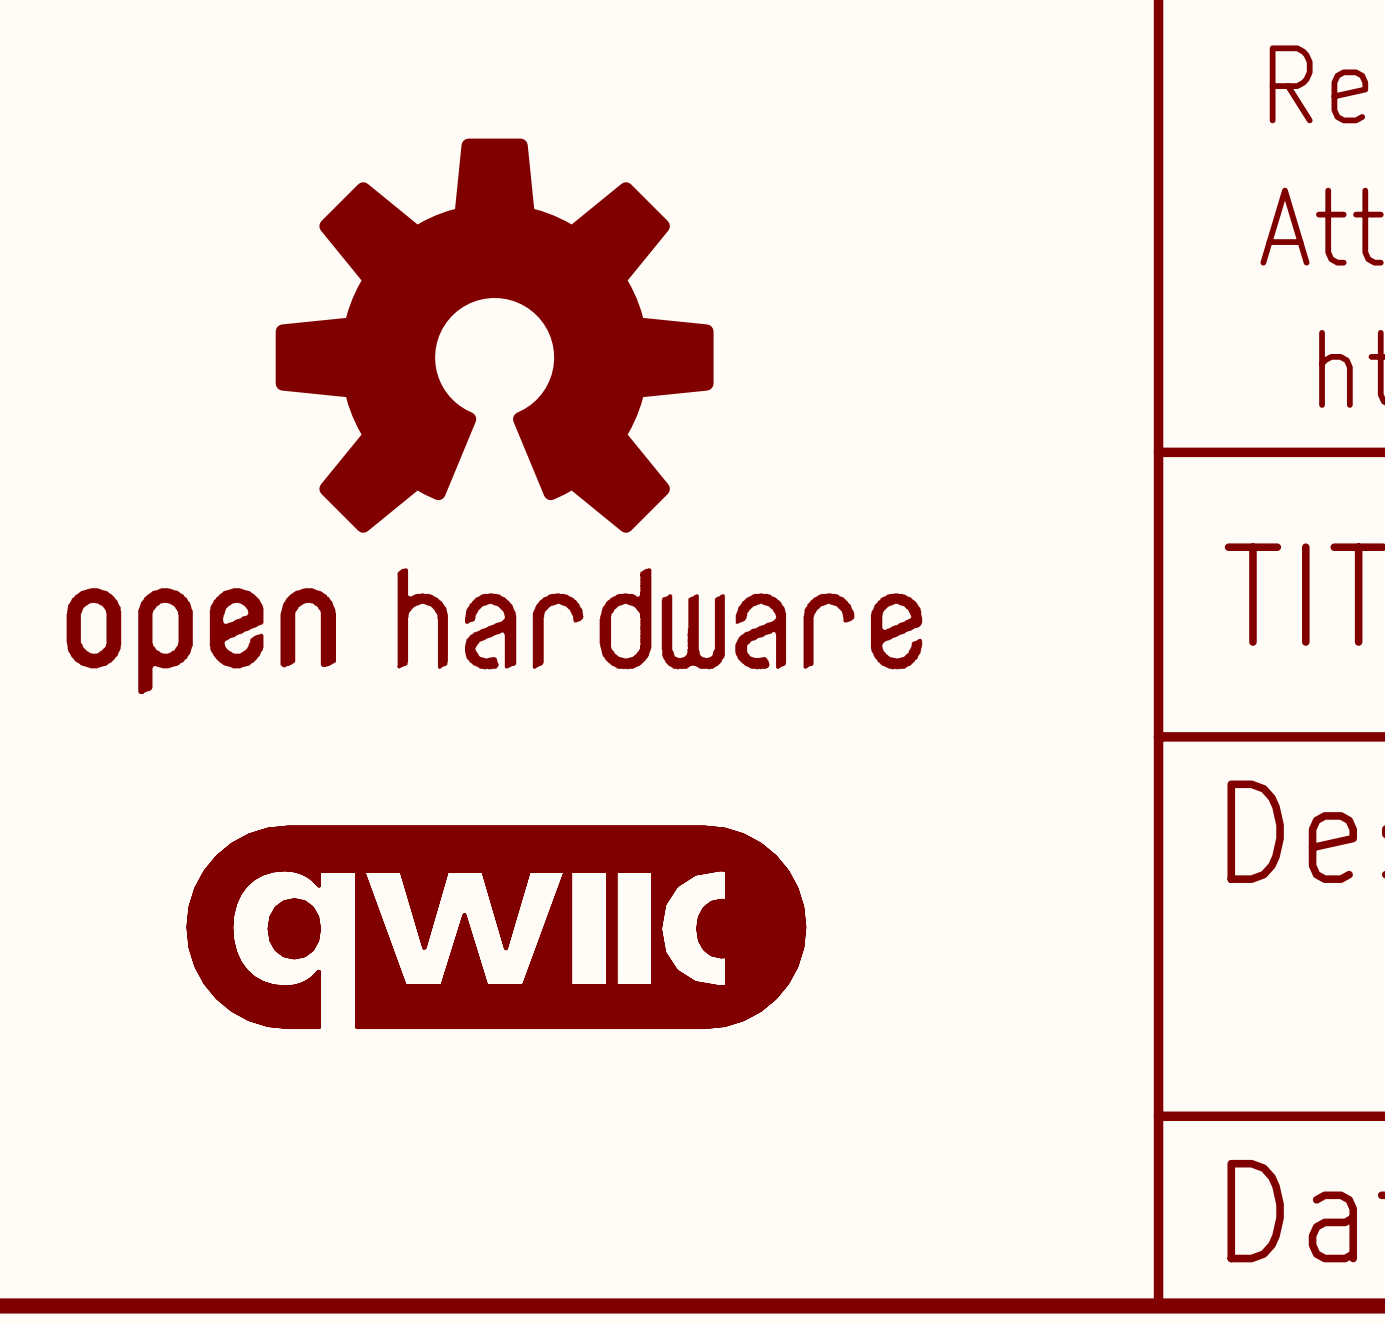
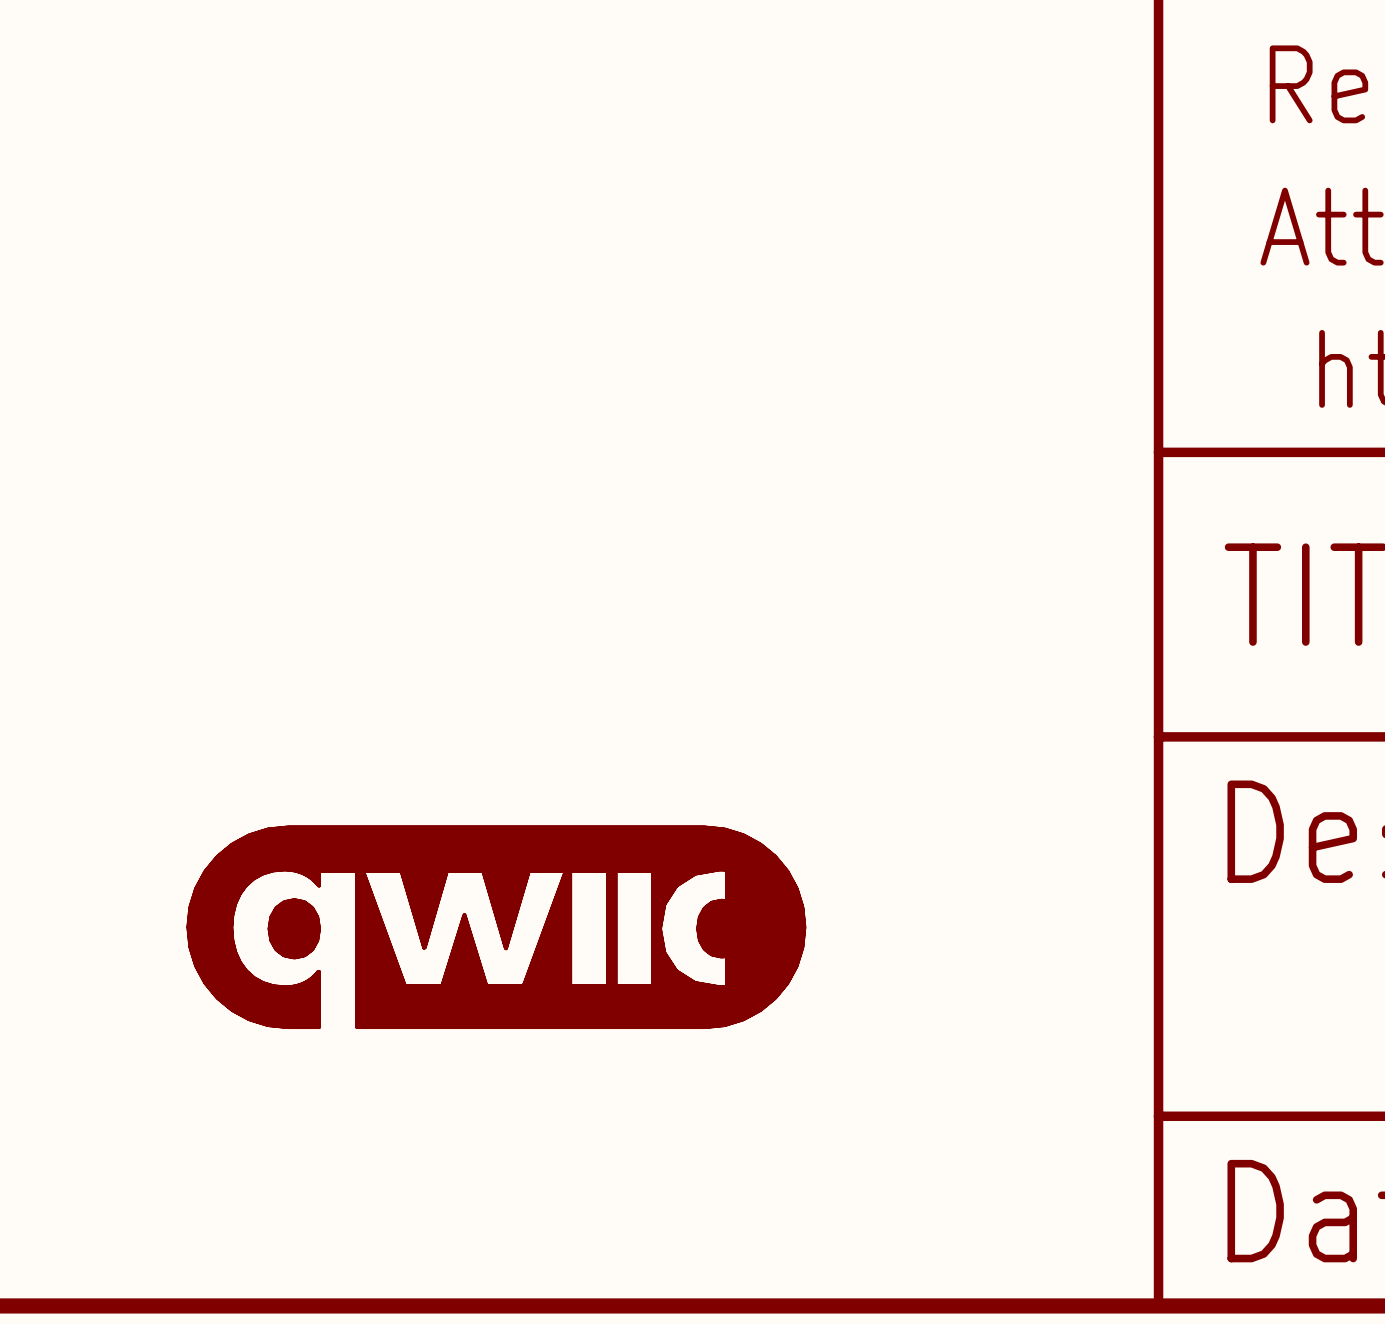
part: (494, 416) -> none

